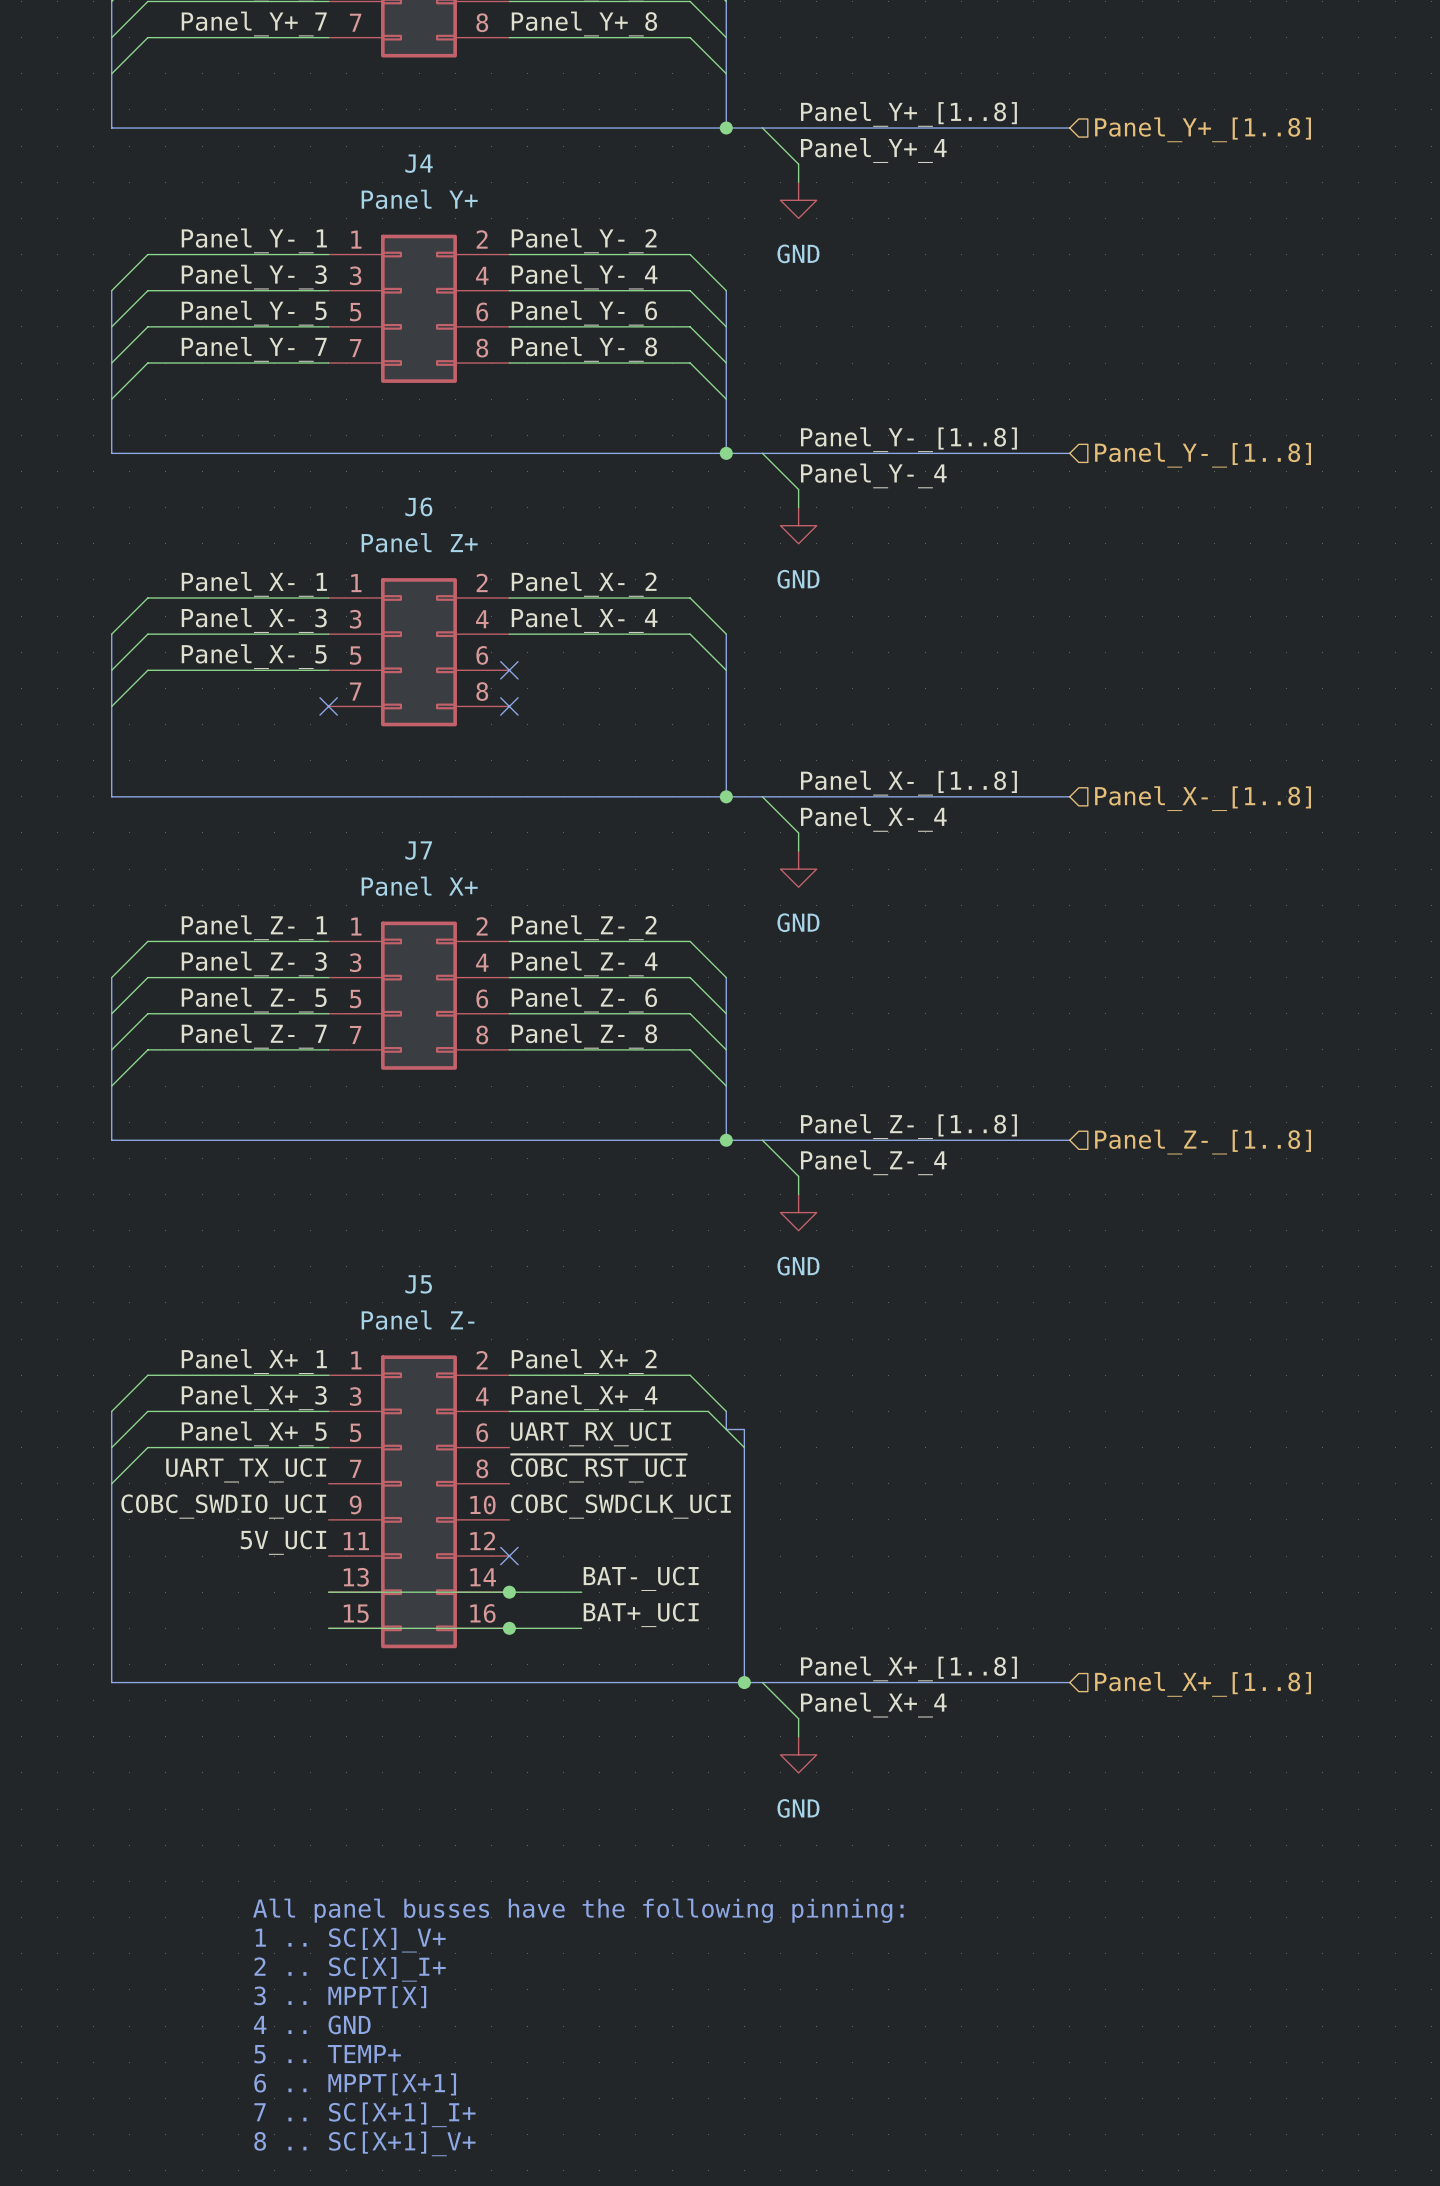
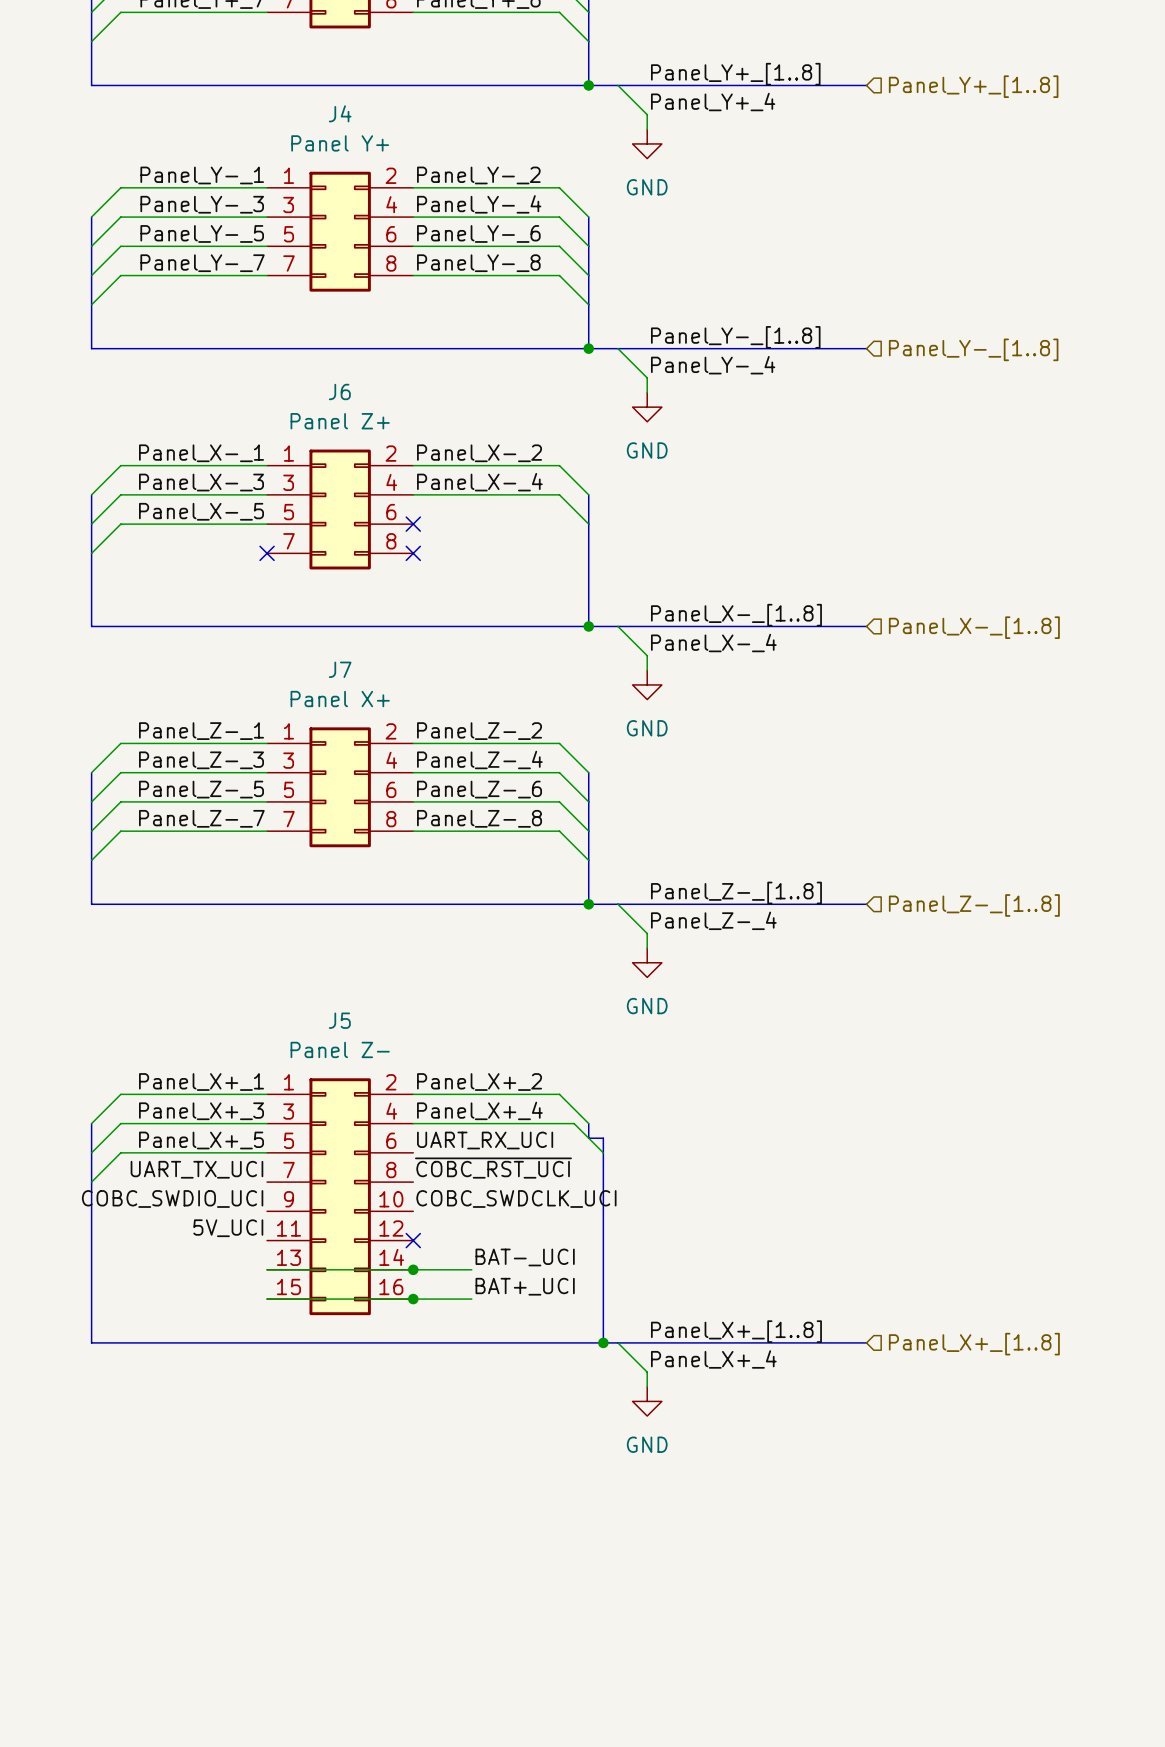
text: All panel busses have the following pinning: (578, 1910) -> none
text: 1 .. SC[X]_V+ (350, 1940) -> none
text: 2 .. SC[X]_I+ (350, 1969) -> none
text: 3 .. MPPT[X] (340, 1997) -> none
text: 4 .. GND (312, 2024) -> none
text: 5 .. TEMP+ (327, 2054) -> none
text: 6 .. MPPT[X+1] (355, 2084) -> none
text: 7 .. SC[X+1]_I+ (364, 2114) -> none
text: 8 .. SC[X+1]_V+ (364, 2143) -> none

